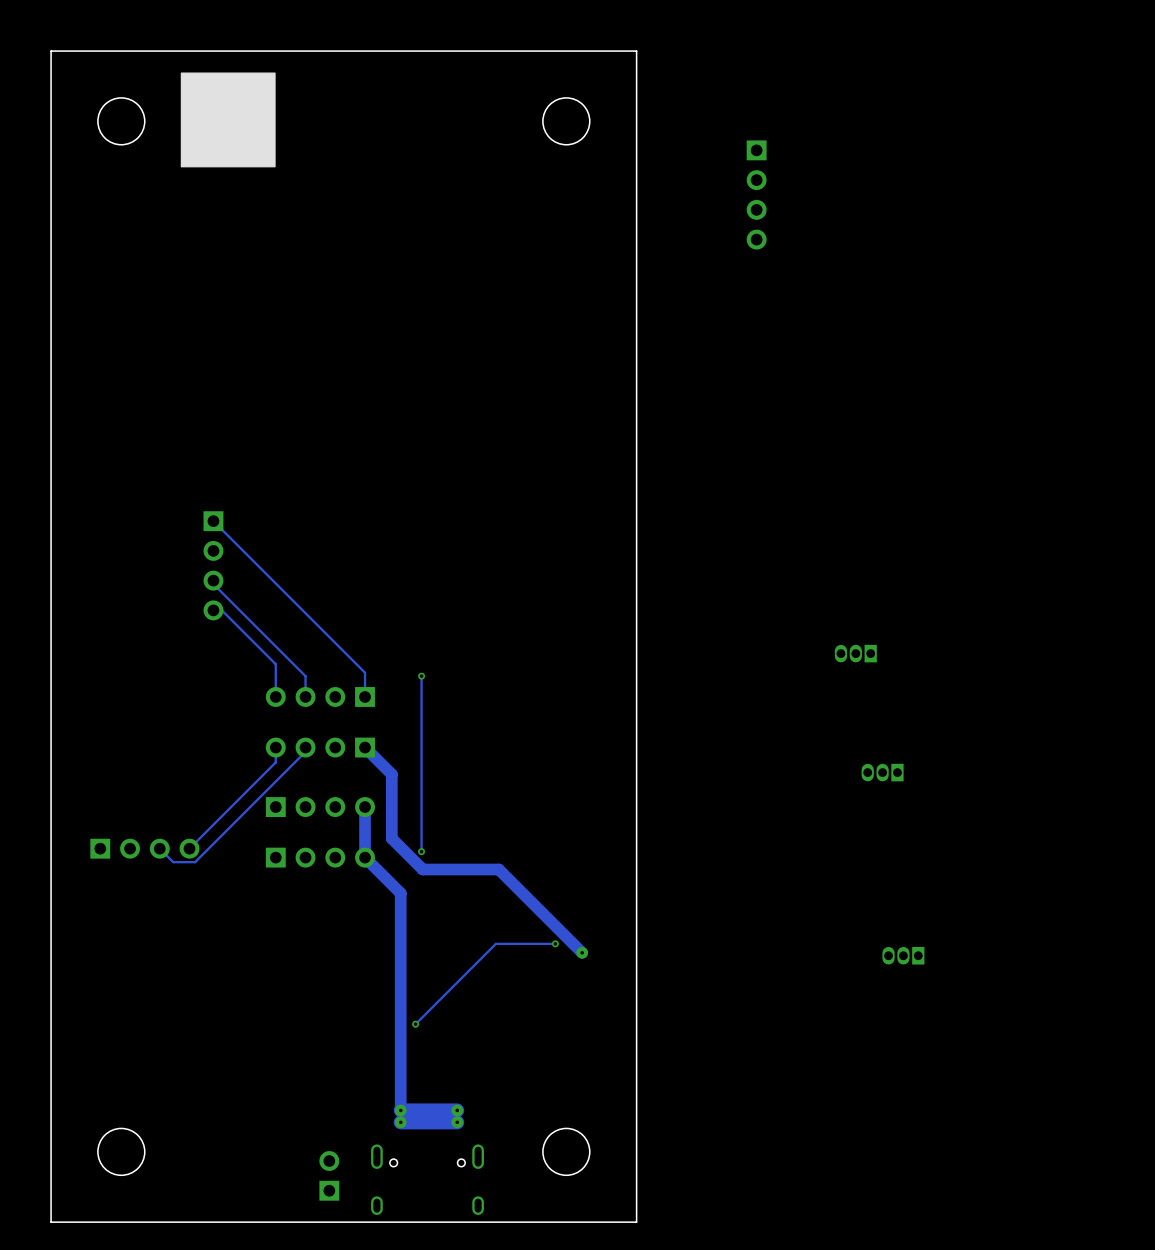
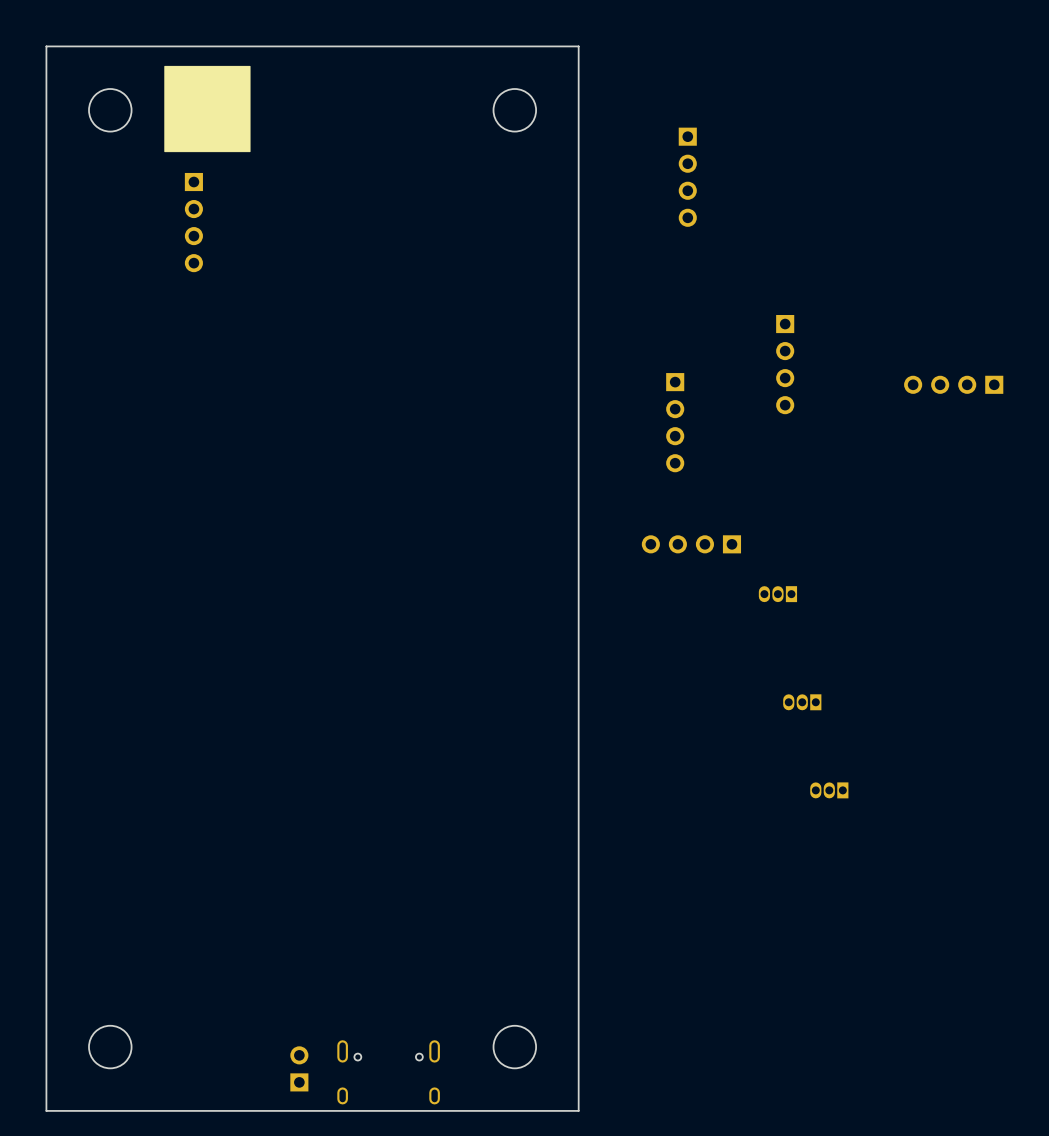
part: none -> (193, 222)
part: none -> (785, 364)
part: none -> (953, 384)
part: none -> (675, 422)
track: (213, 521) (365, 672) (365, 696) -> none
part: (213, 565) -> none
track: (213, 580) (213, 584) (305, 676) (305, 696) -> none
part: none -> (691, 544)
track: (213, 610) (221, 610) (275, 664) (275, 696) -> none
track: (421, 676) (421, 851) -> none
via: (421, 676) -> none
part: (320, 696) -> none
track: (275, 747) (275, 762) (189, 848) -> none
track: (305, 747) (305, 751) (195, 862) (173, 862) (159, 848) -> none
part: (320, 747) -> none
track: (365, 747) (391, 774) (391, 838) (422, 869) (498, 869) (582, 952) -> none
part: (320, 807) -> none
track: (365, 807) (365, 857) (400, 893) (400, 1110) (457, 1110) -> none
part: (144, 848) -> none
via: (421, 851) -> none
part: (320, 857) -> none
track: (555, 943) (495, 943) (415, 1024) -> none
via: (555, 943) -> none
via: (582, 952) -> none
part position: (903, 955) -> (829, 790)
via: (415, 1024) -> none
via: (400, 1110) -> none
via: (457, 1110) -> none
via: (400, 1122) -> none
track: (457, 1122) (400, 1122) -> none
via: (457, 1122) -> none

